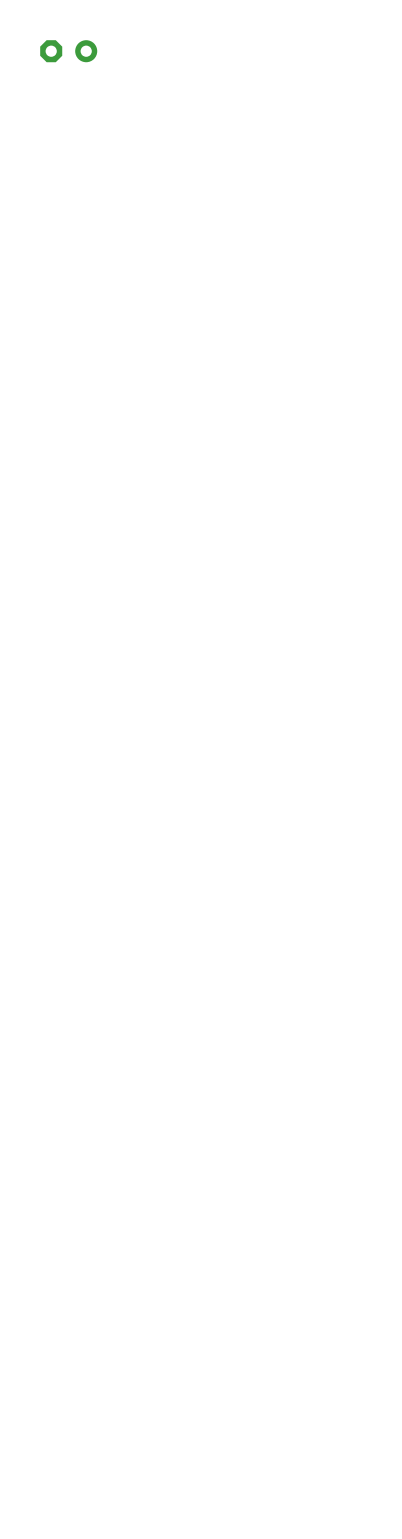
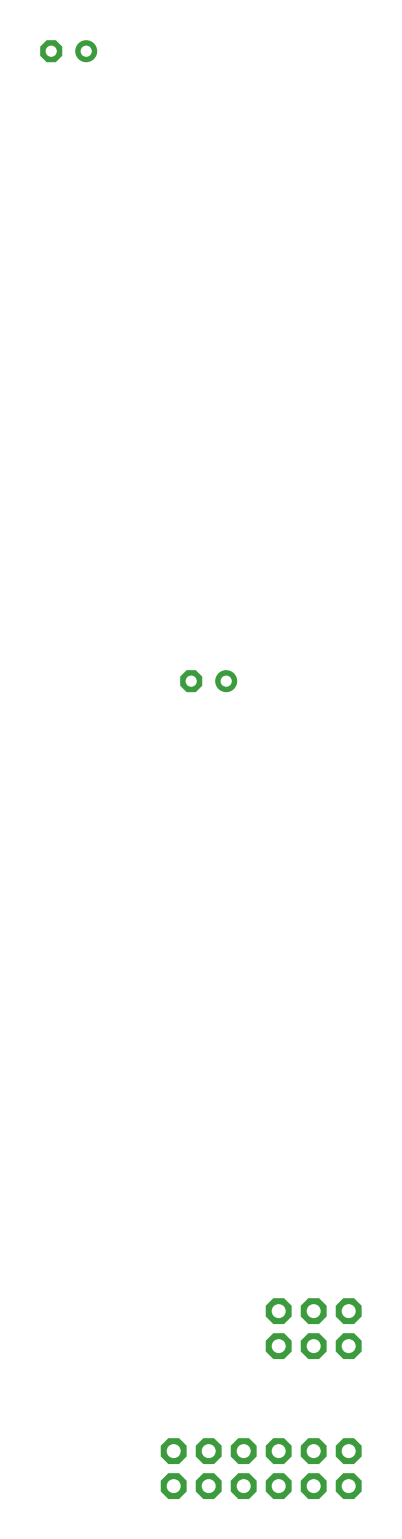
part: none -> (208, 681)
part: none -> (313, 1328)
part: none -> (261, 1468)

